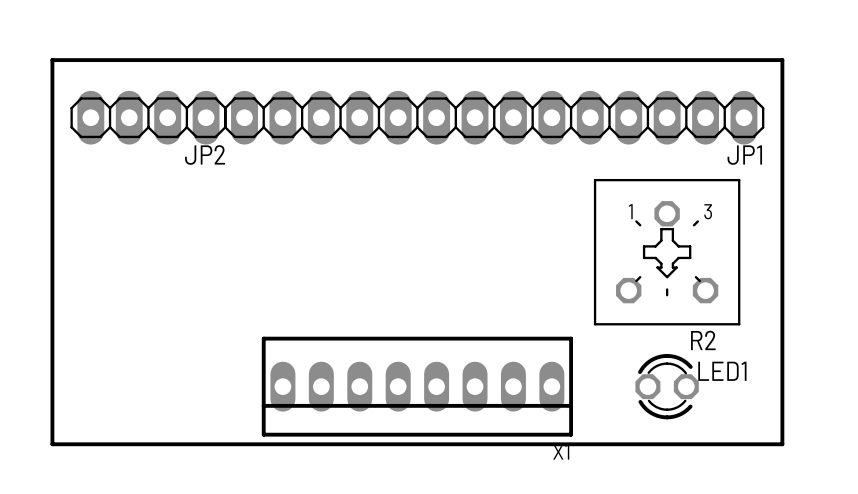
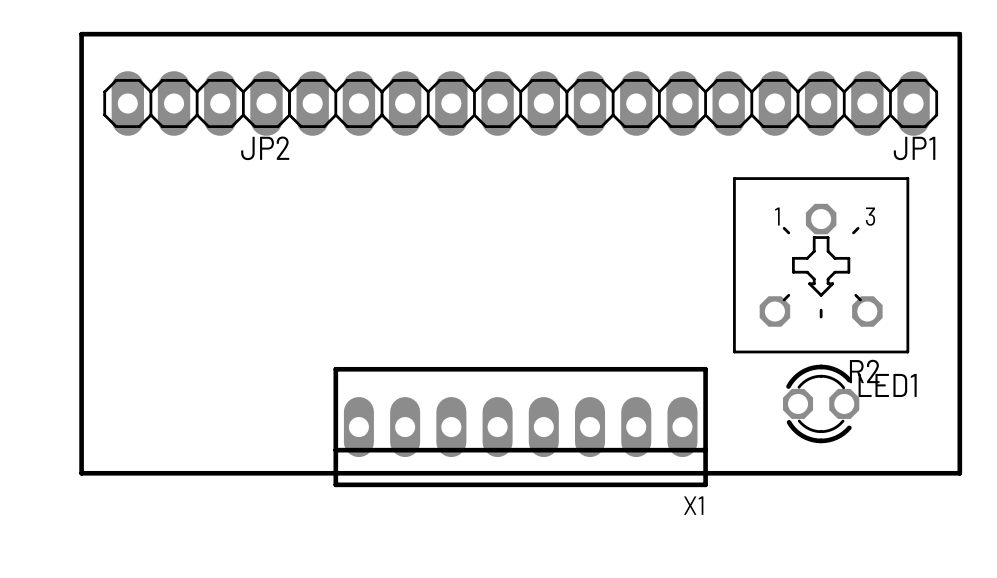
LED1 position: (667, 386) -> (821, 403)
board edge: (52, 425) (52, 444) (782, 444) (782, 425) -> (81, 473) (959, 473)

